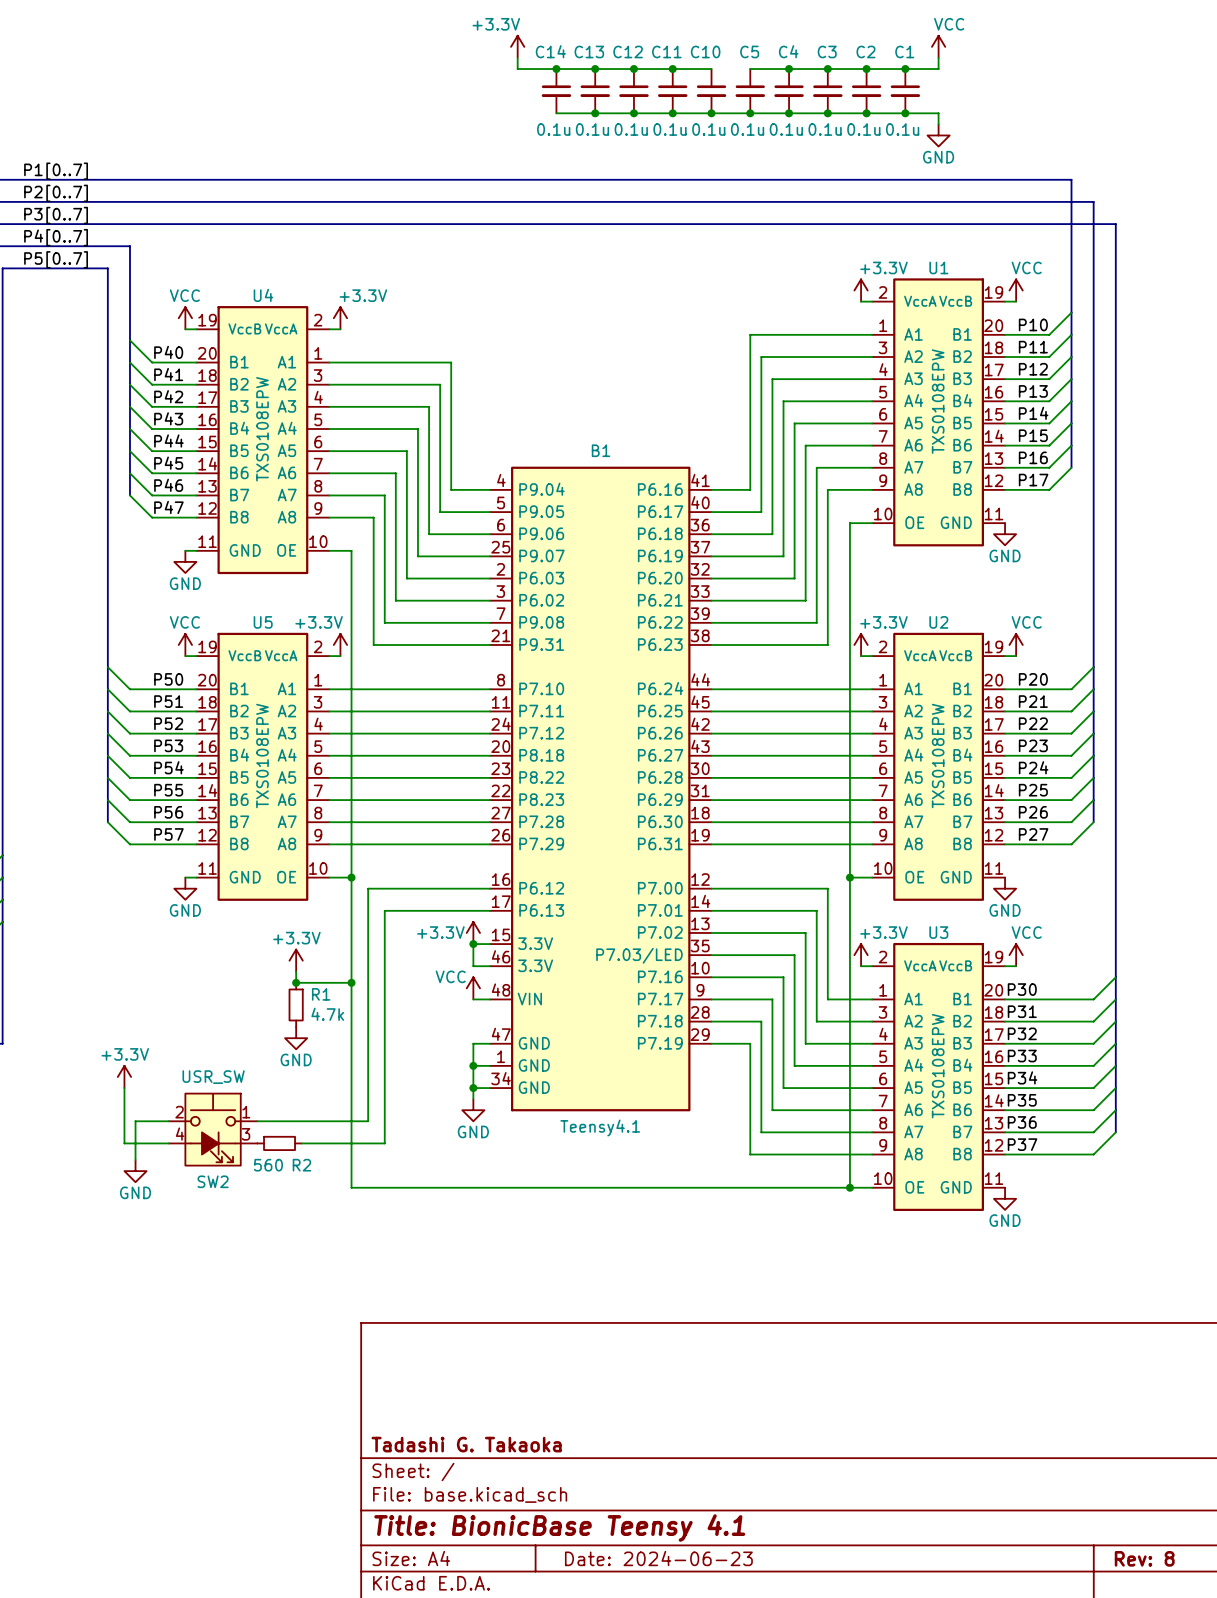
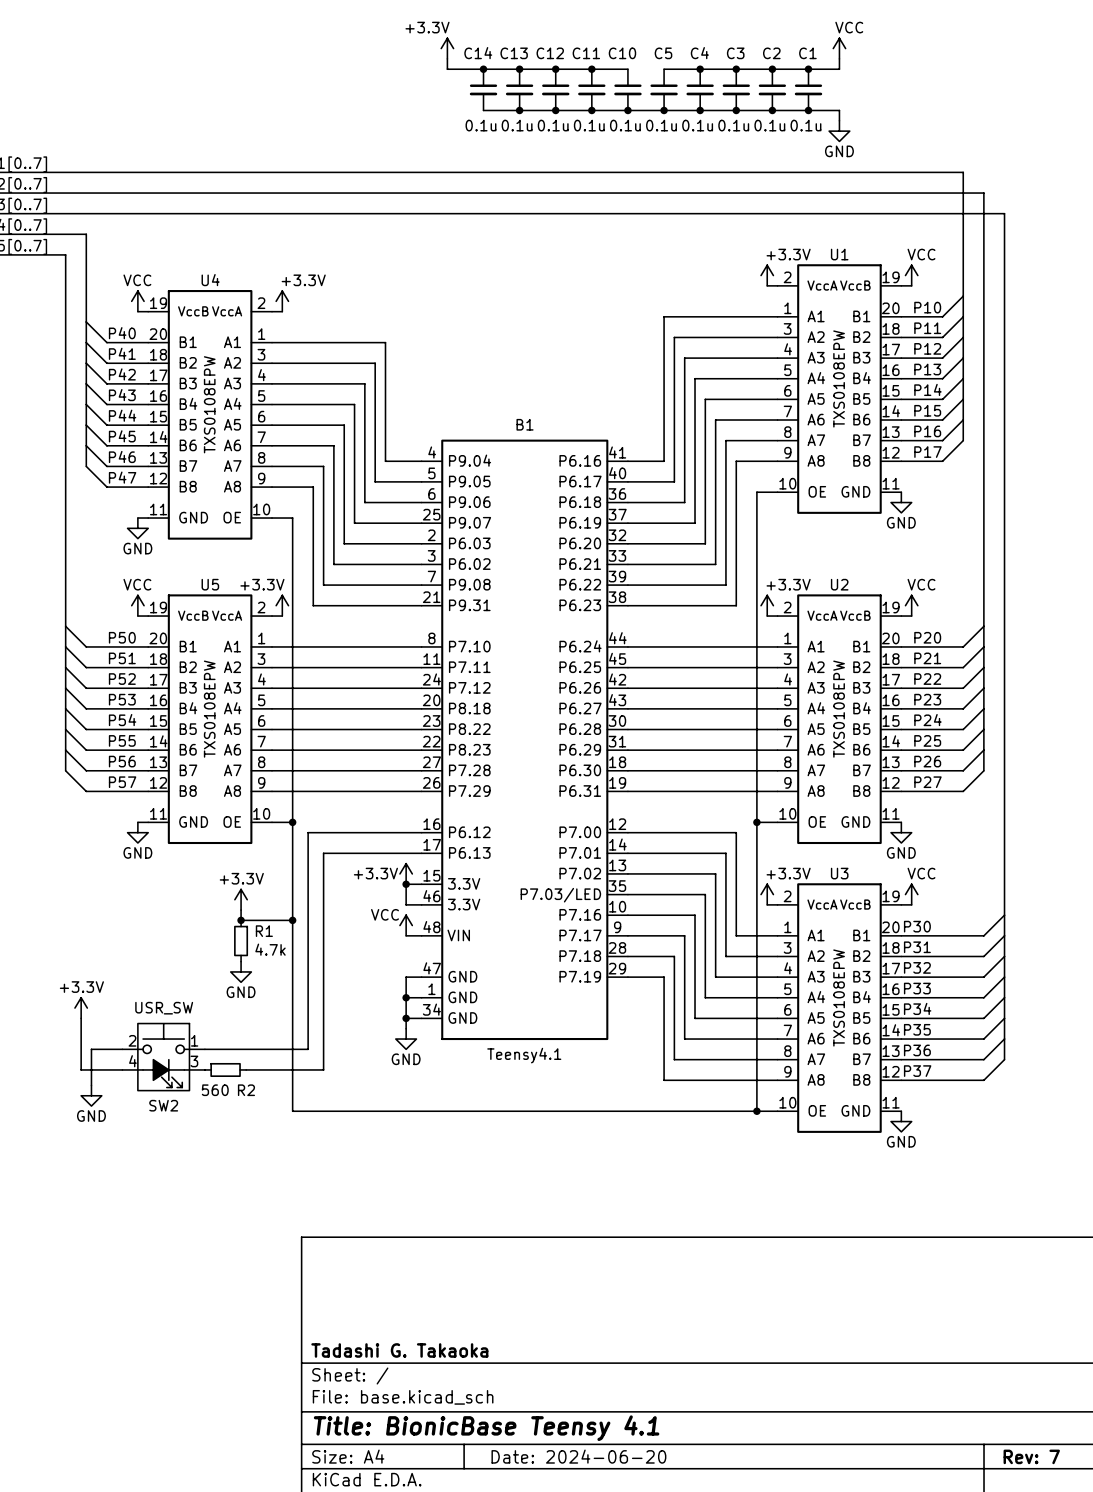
title block: Date: 2024-06-23 (658, 1558) -> Date: 2024-06-20 (578, 1456)
title block: Rev: 8 (1144, 1558) -> Rev: 7 (1031, 1456)

